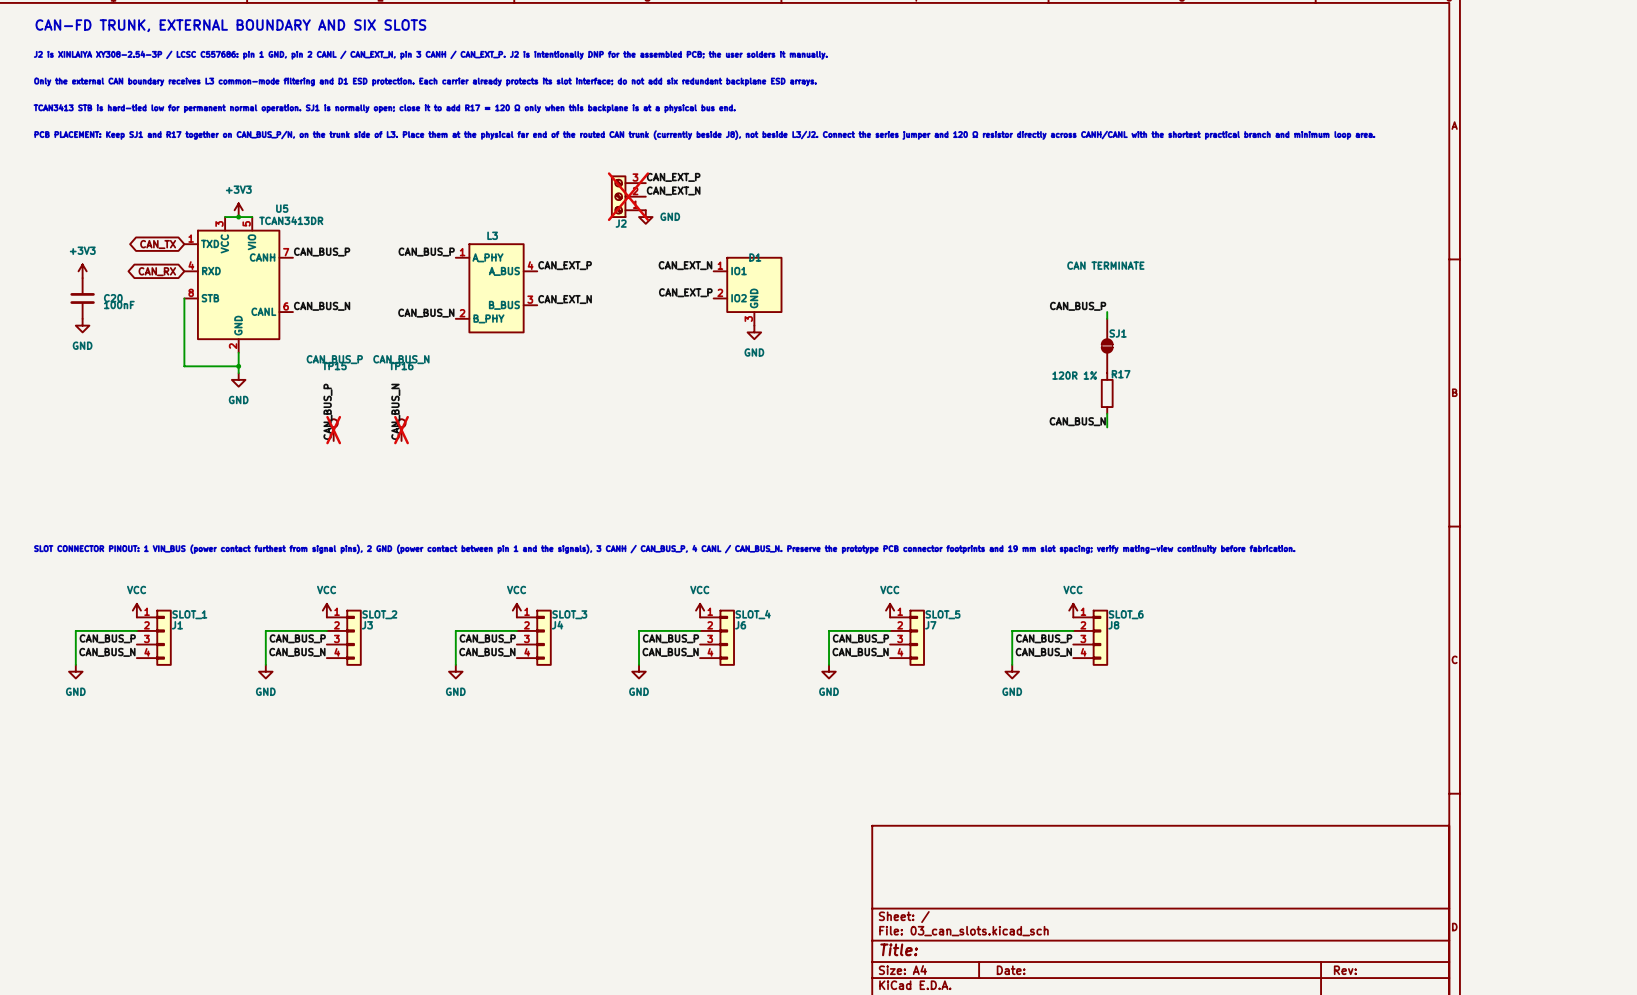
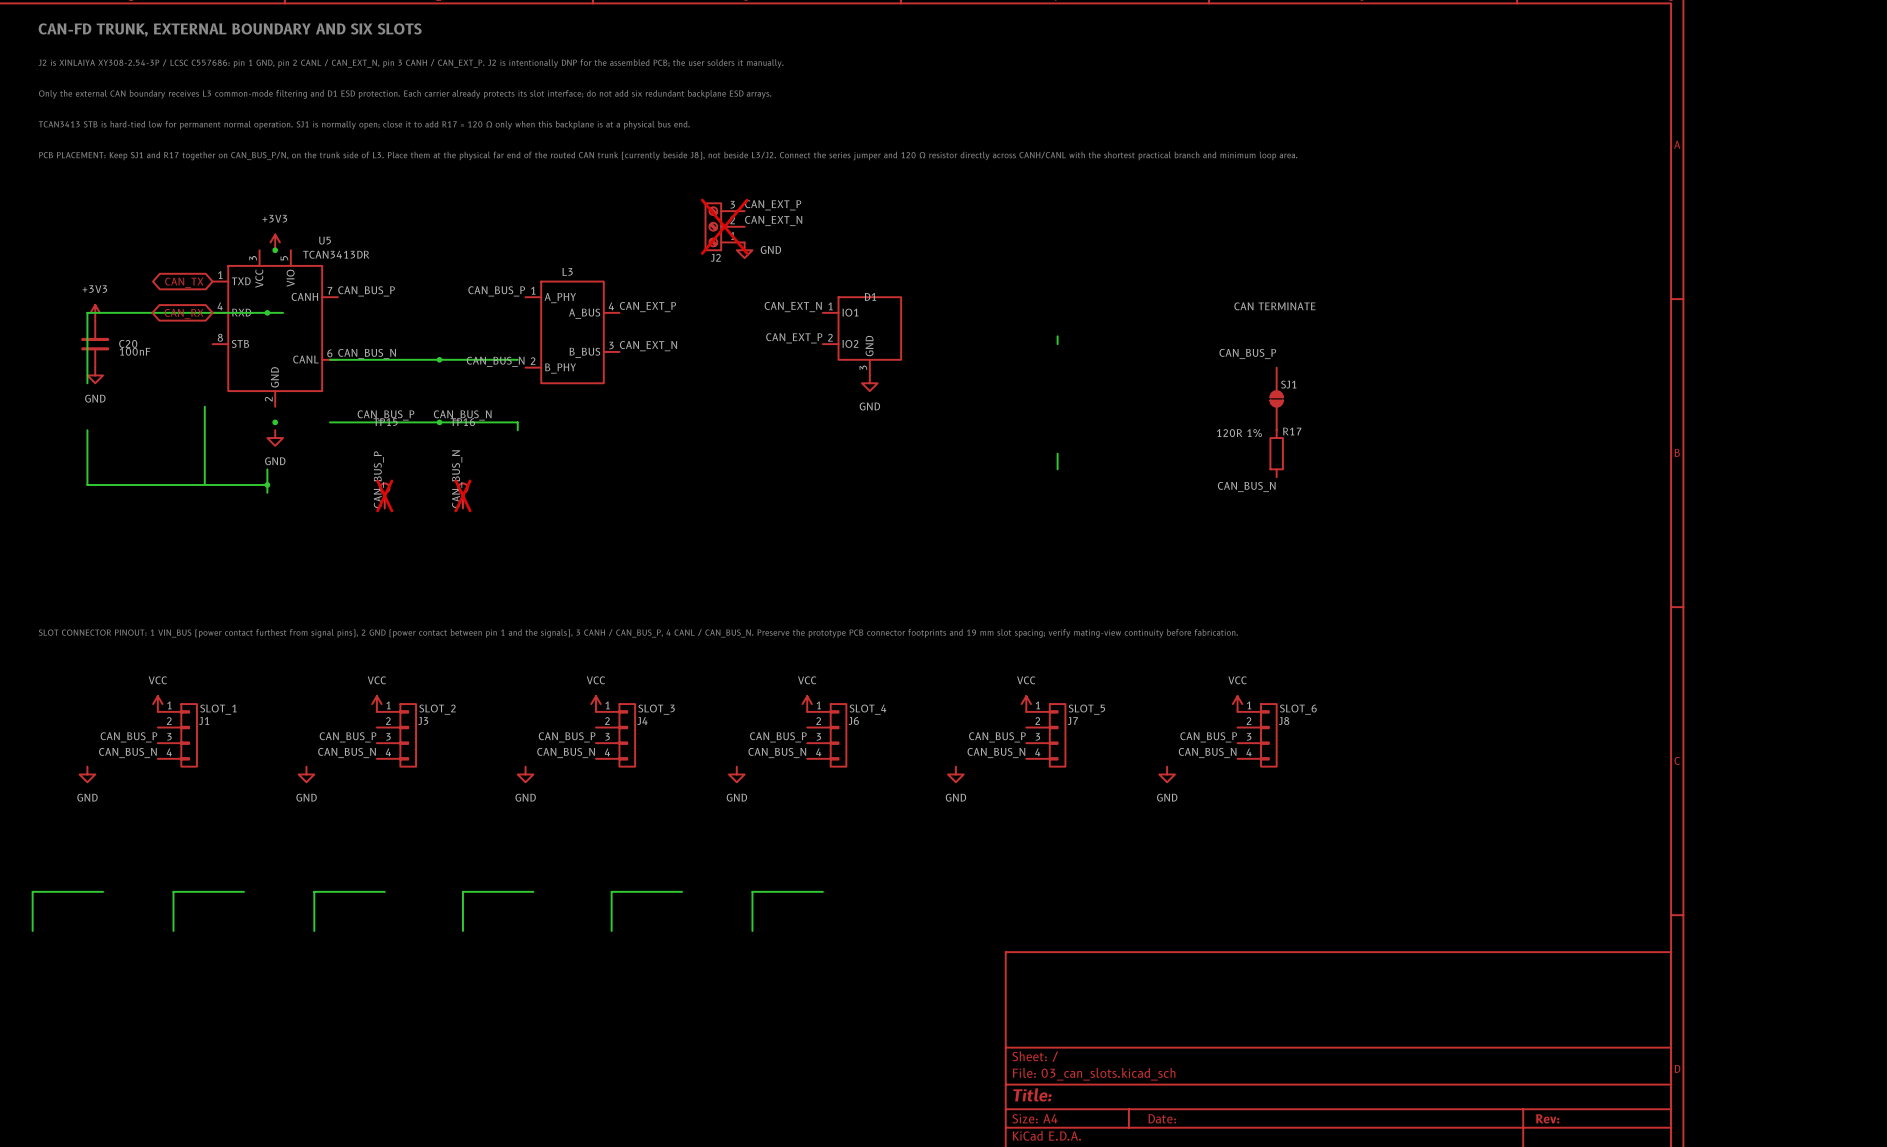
wire: (225, 217) (252, 217) -> none
junction: none -> (267, 312)
wire: none -> (283, 312) (87, 312) (87, 383)
wire: none -> (1057, 336) (1057, 344)
wire: (184, 298) (184, 366) (238, 366) -> none
wire: none -> (329, 359) (517, 359)
junction: none -> (439, 359)
wire: (1107, 312) (1107, 318) -> none
wire: none -> (204, 406) (204, 484)
wire: (238, 352) (238, 373) -> (267, 469) (267, 492)
wire: none -> (329, 422) (517, 422) (517, 430)
junction: none -> (439, 422)
wire: none -> (87, 430) (87, 484) (267, 484)
wire: none -> (1057, 453) (1057, 469)
wire: (1107, 413) (1107, 427) -> none
junction: none -> (267, 484)
wire: (136, 630) (75, 630) (75, 664) -> none
wire: (326, 630) (265, 630) (265, 664) -> none
wire: (516, 630) (455, 630) (455, 664) -> none
wire: (700, 630) (639, 630) (639, 664) -> none
wire: (890, 630) (829, 630) (829, 664) -> none
wire: (1073, 630) (1012, 630) (1012, 664) -> none
wire: none -> (103, 891) (32, 891) (32, 930)
wire: none -> (243, 891) (173, 891) (173, 930)
wire: none -> (384, 891) (314, 891) (314, 930)
wire: none -> (533, 891) (462, 891) (462, 930)
wire: none -> (682, 891) (611, 891) (611, 930)
wire: none -> (822, 891) (752, 891) (752, 930)

